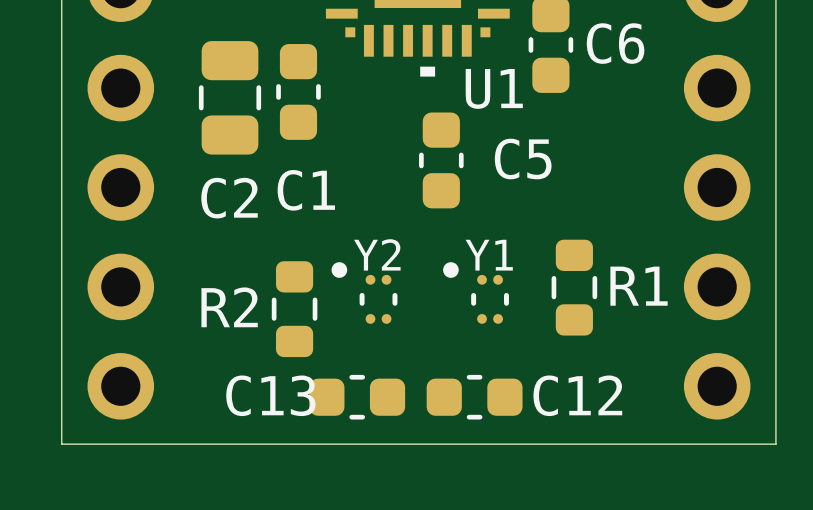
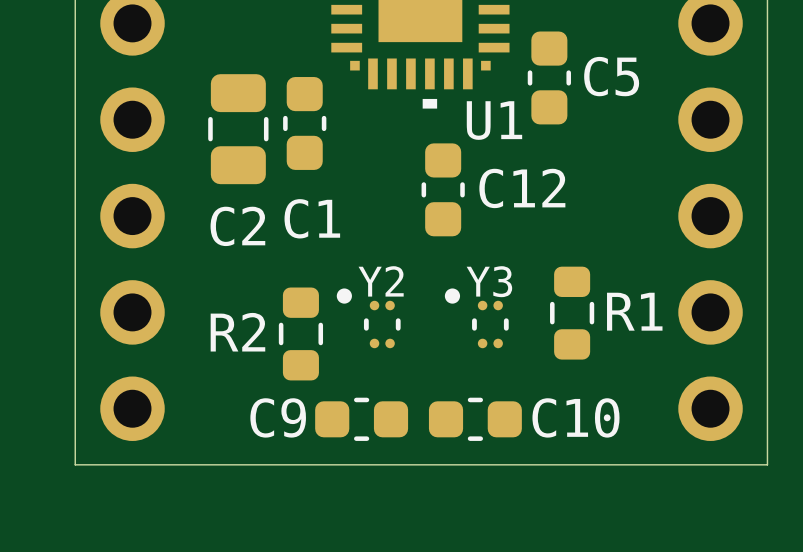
C6 name: C6 (615, 43) -> C5 (611, 76)
C5 name: C5 (523, 159) -> C12 (522, 188)
Y1 name: Y1 (489, 255) -> Y3 (489, 281)
C13 name: C13 (270, 395) -> C9 (278, 417)
C12 name: C12 (577, 395) -> C10 (575, 417)

